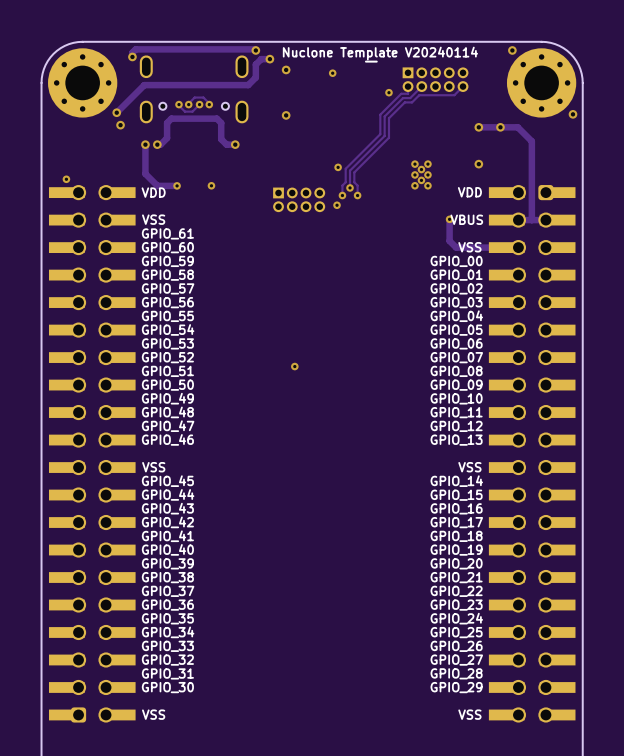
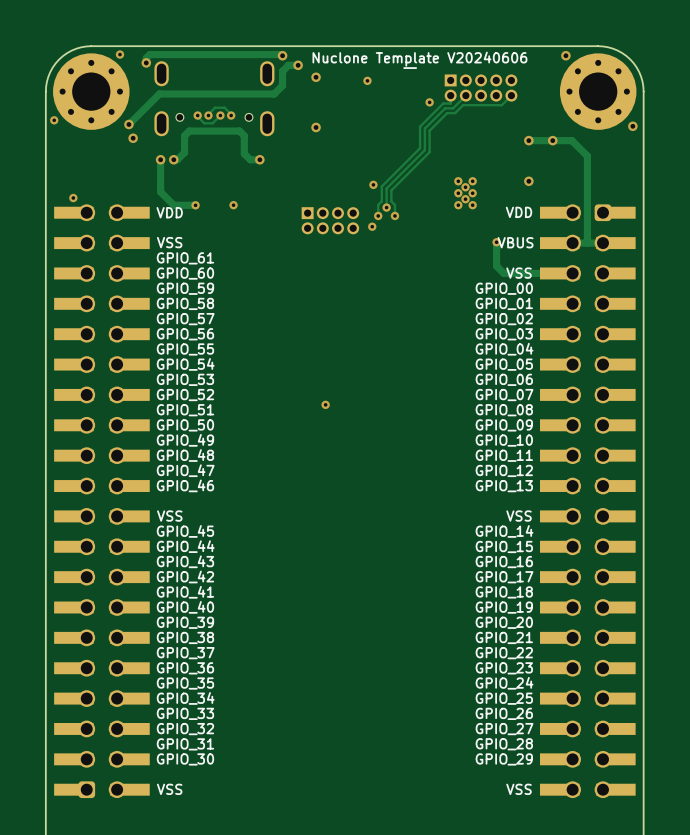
drawing shape: [282, 46, 478, 63] -> [312, 51, 528, 69]
via: none -> (119, 54)
via: none -> (54, 120)

